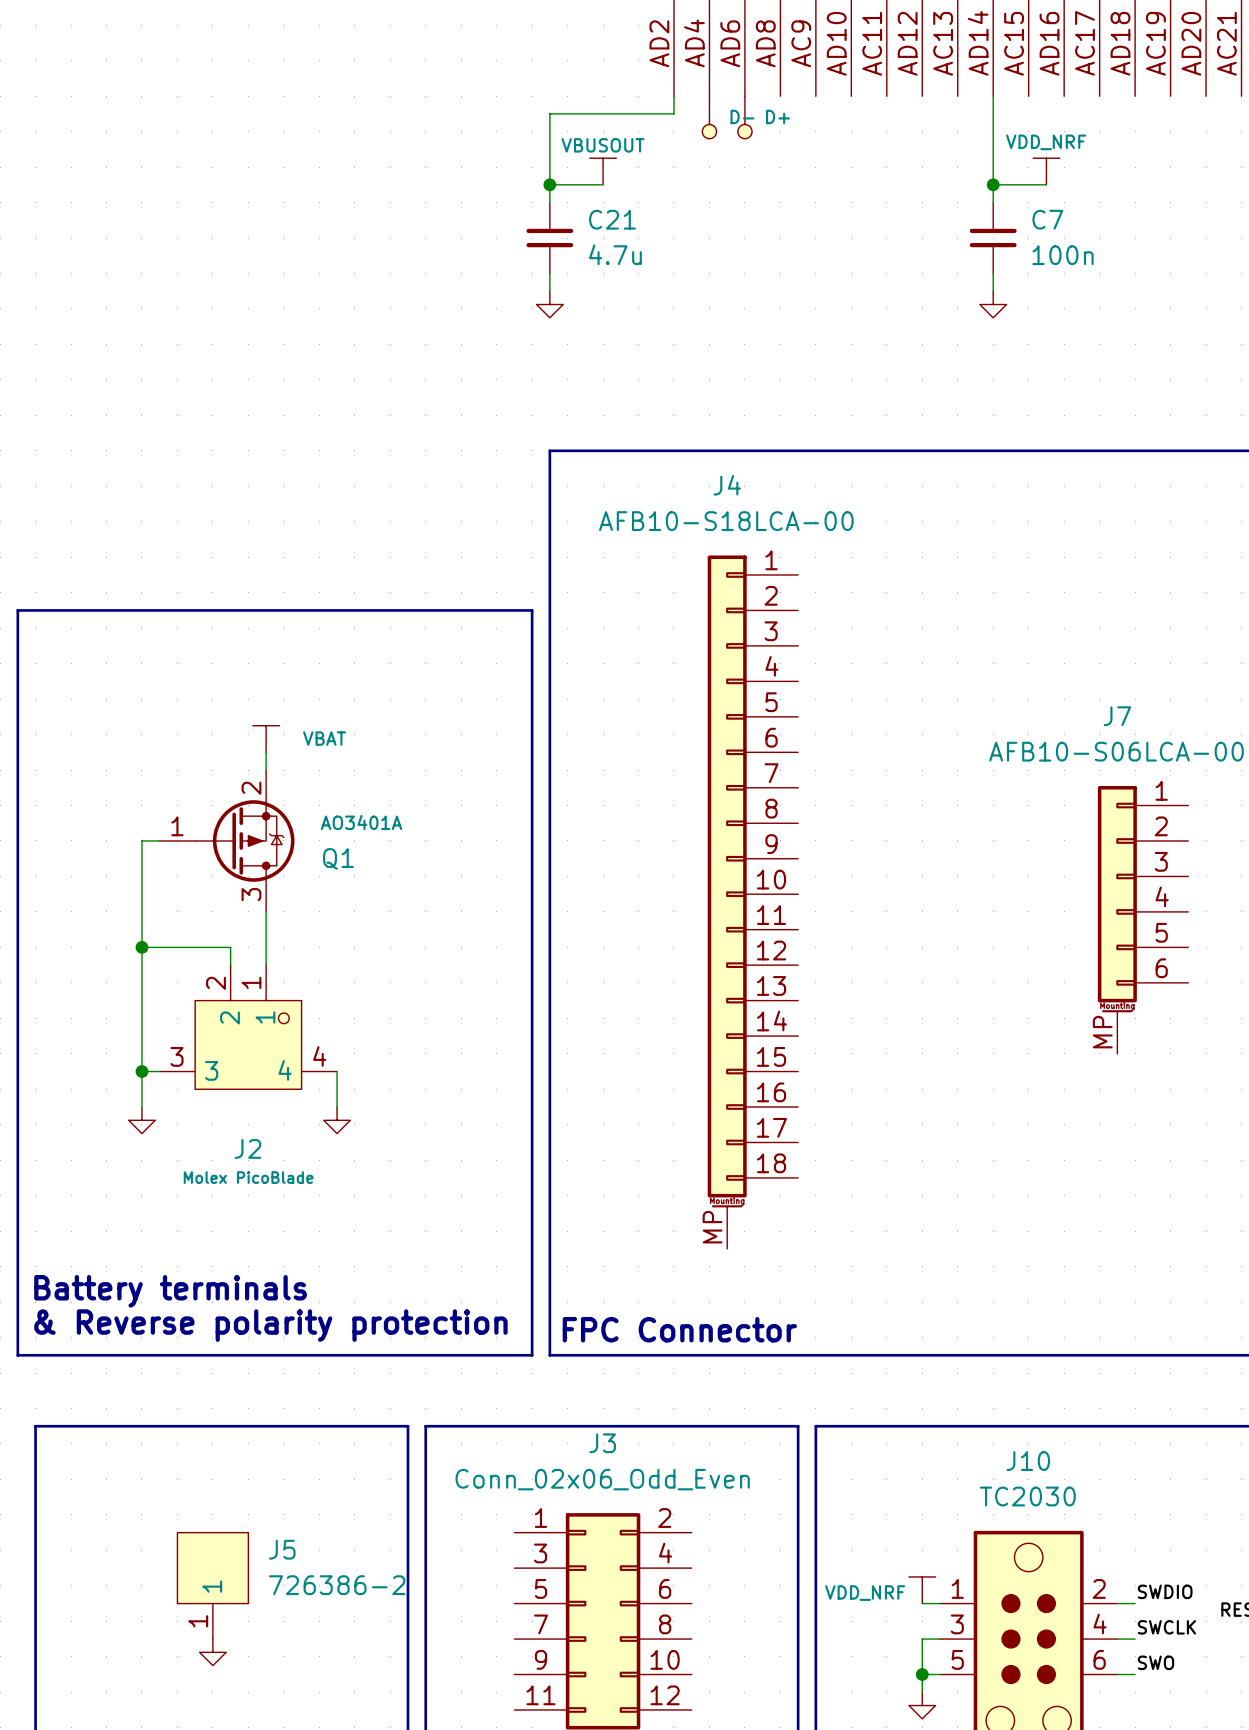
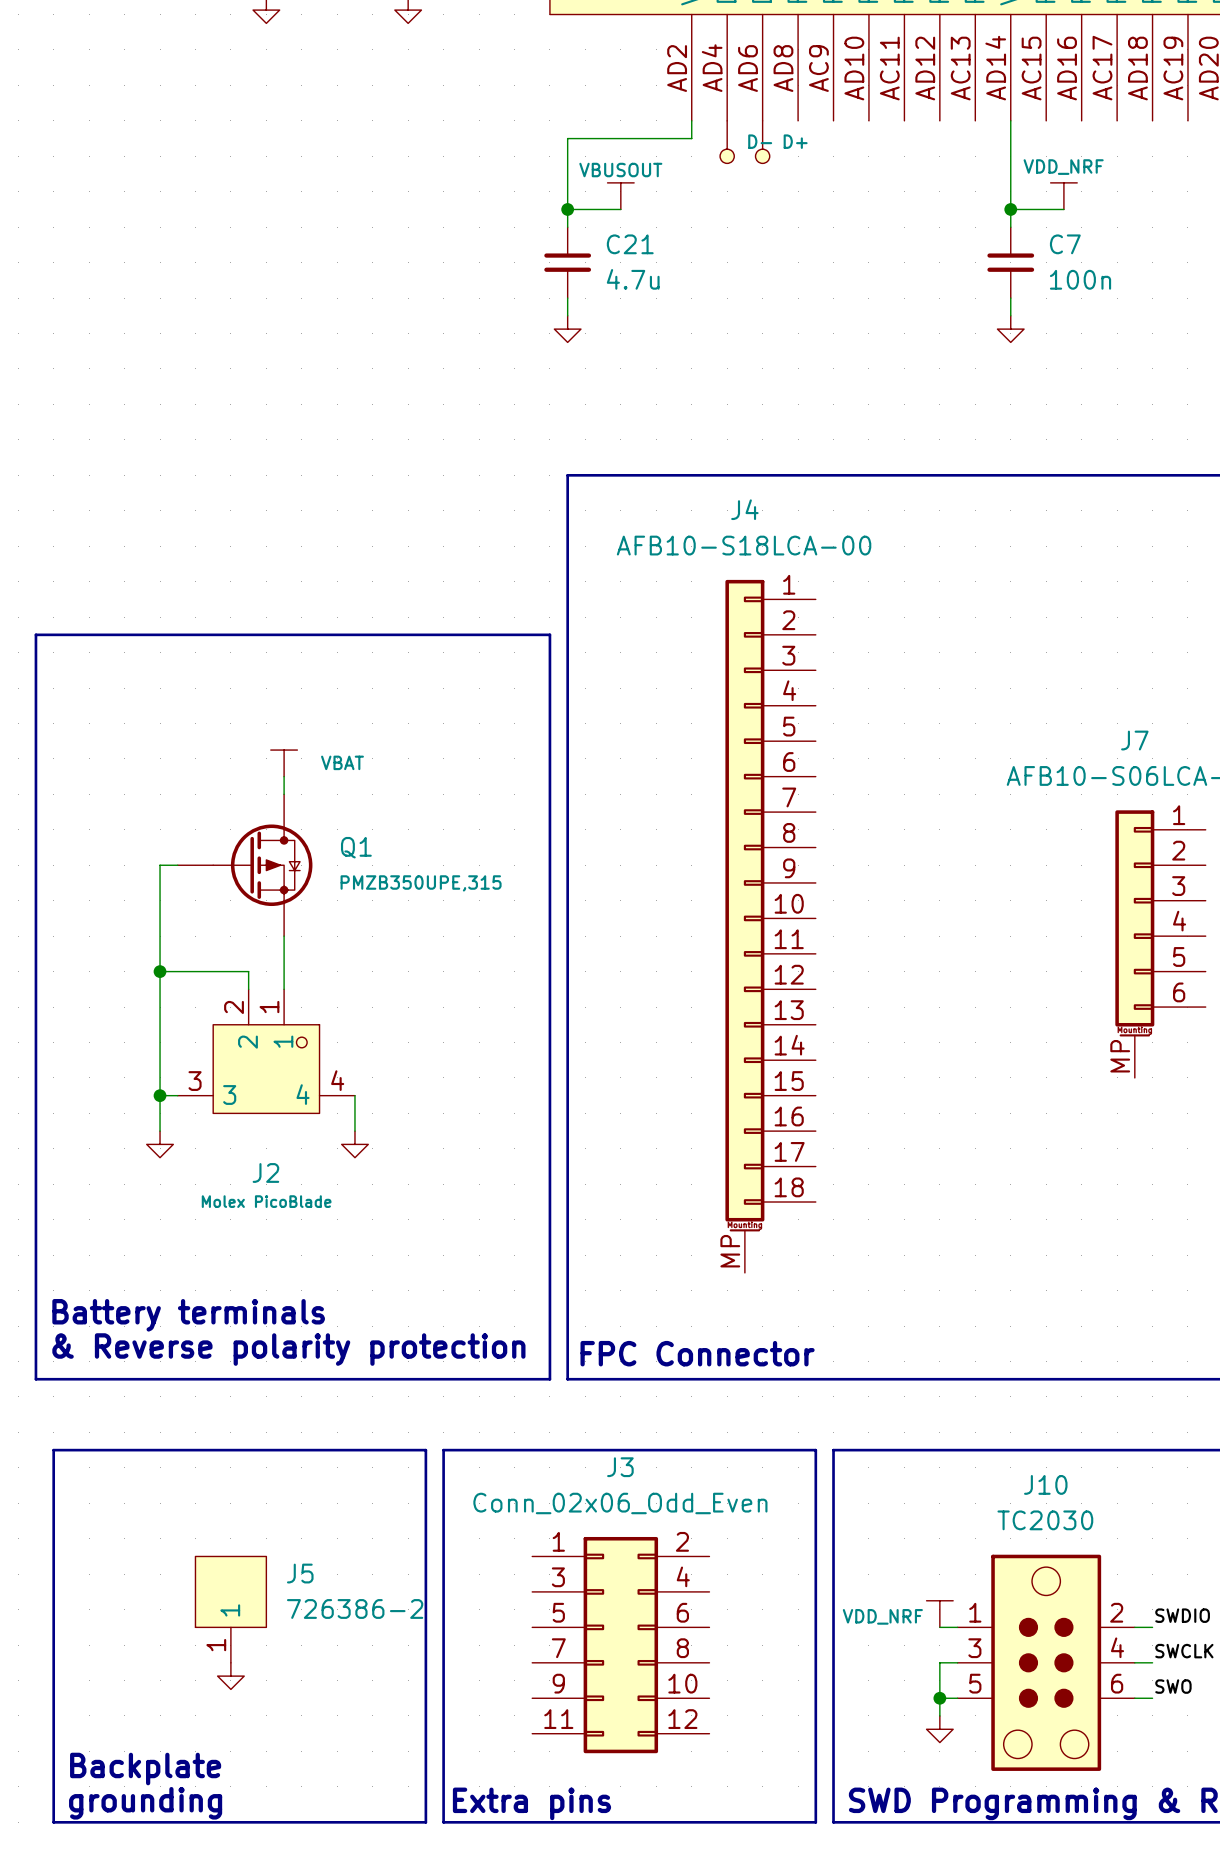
Q1 symbol: [159, 770, 295, 912] -> [177, 794, 313, 937]
Q1 value: AO3401A (361, 822) -> PMZB350UPE,315 (421, 883)
Q1 name position: Q1 (338, 858) -> Q1 (356, 847)

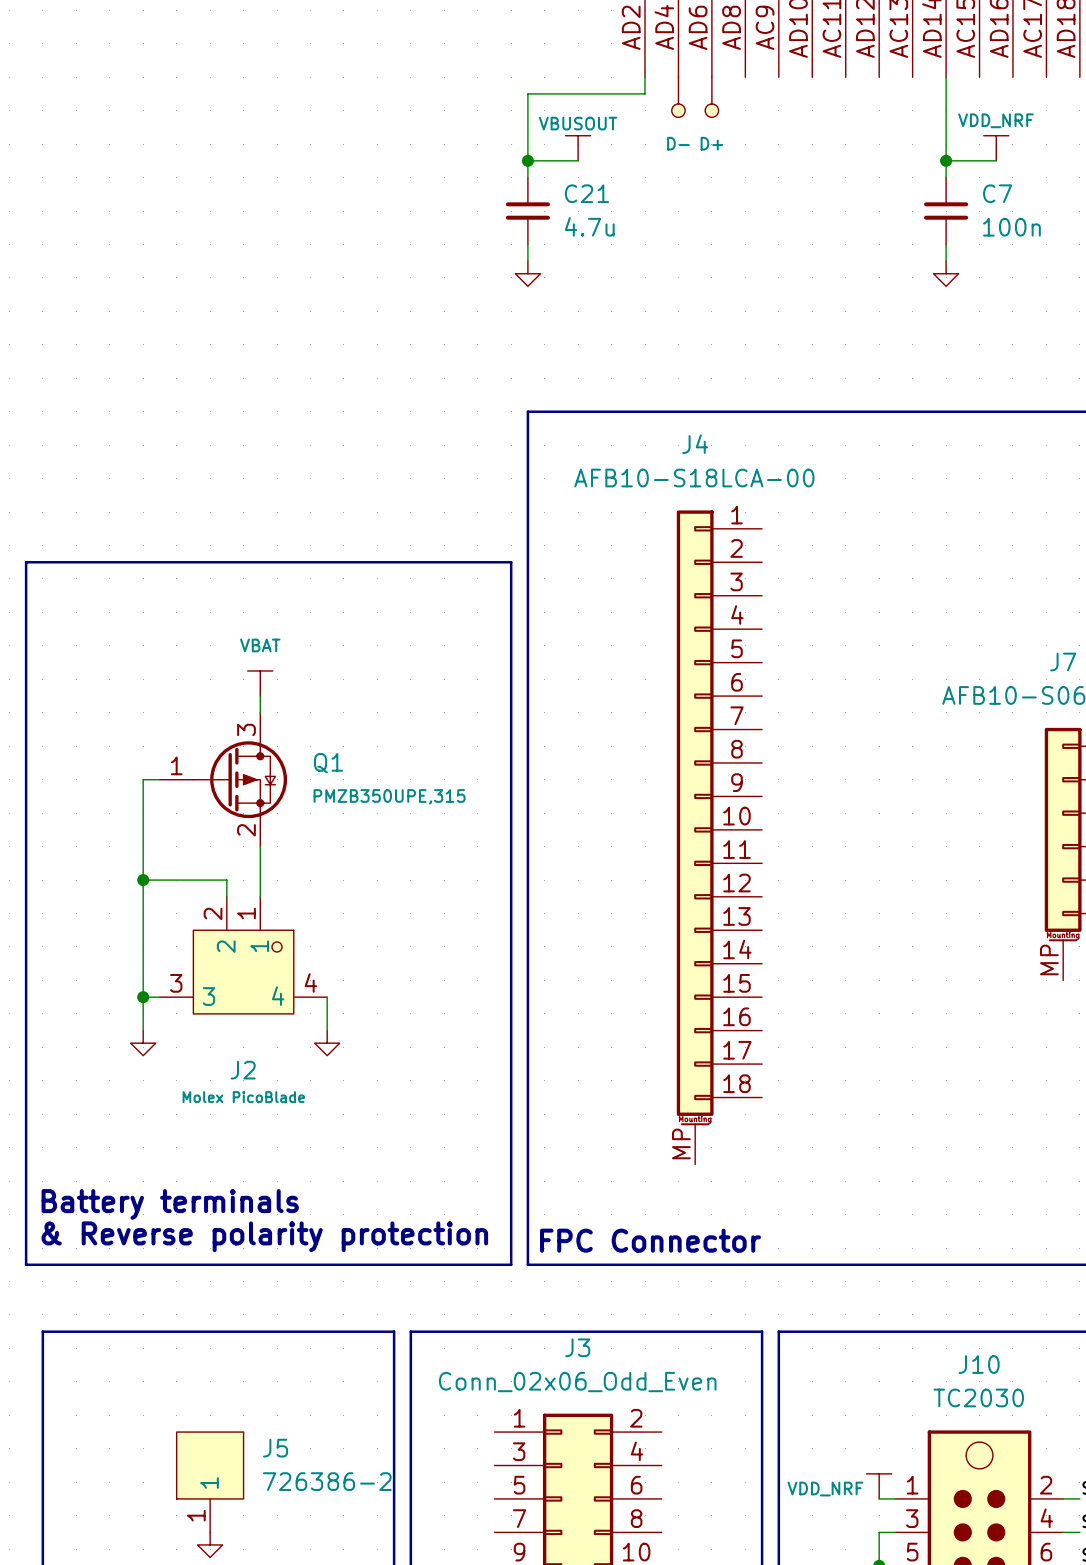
power symbol text position: D- (760, 141) -> D- (678, 143)
power symbol text position: D+ (795, 141) -> D+ (711, 143)
power symbol text position: VBAT (342, 762) -> VBAT (260, 645)
Q1 pin number: none -> 3 (246, 729)
Q1 pin number: none -> 1 (176, 765)
Q1 pin number: none -> 2 (246, 830)

